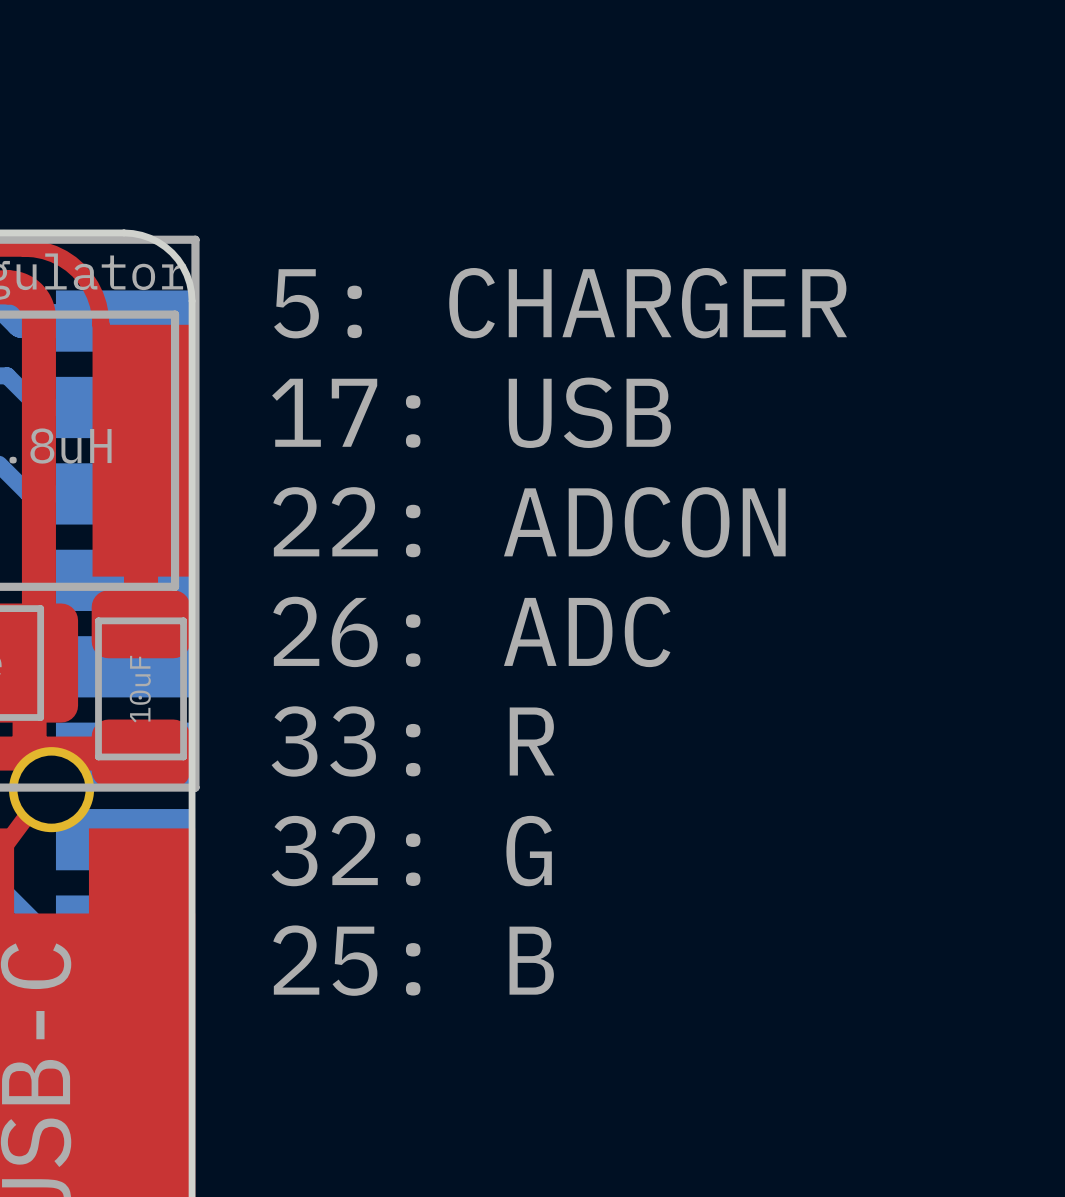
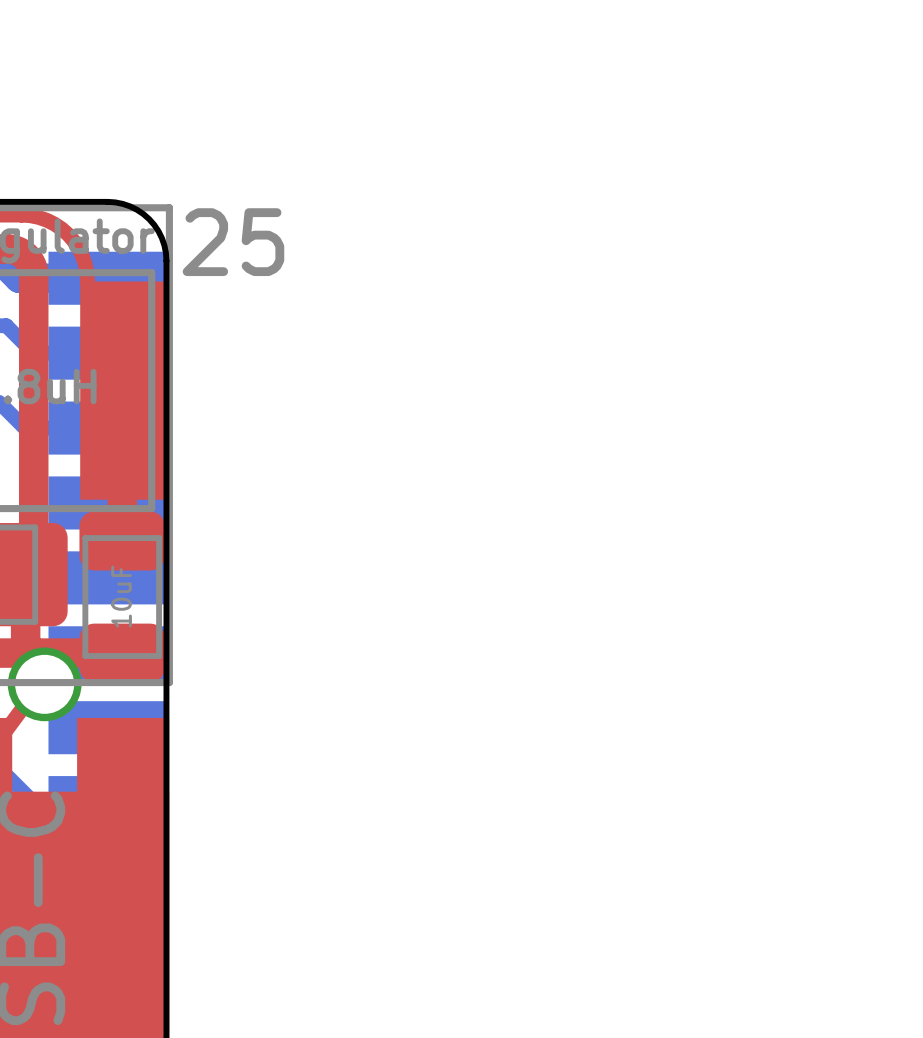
text: 5: CHARGER (560, 303) -> 25 (233, 242)
text: 17: USB (471, 412) -> none
text: 22: ADCON (529, 522) -> none
text: 26: ADC (471, 631) -> none
text: 33: R (413, 741) -> none
text: 32: G (411, 851) -> none
text: 25: B (413, 960) -> none

